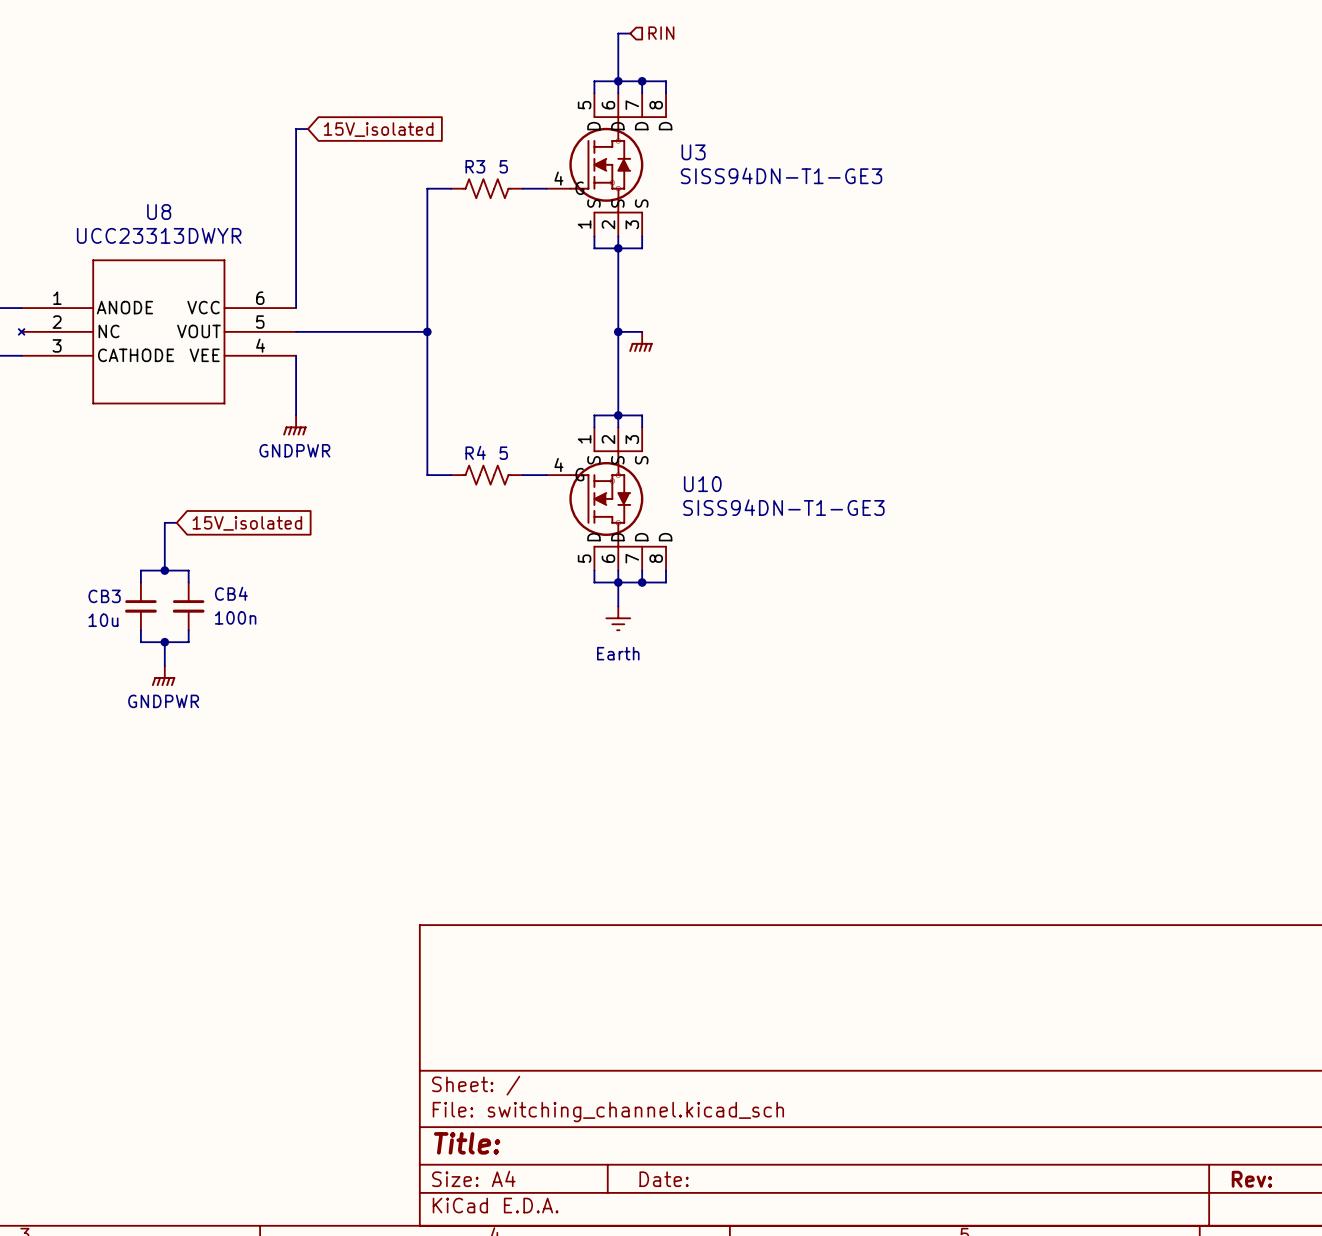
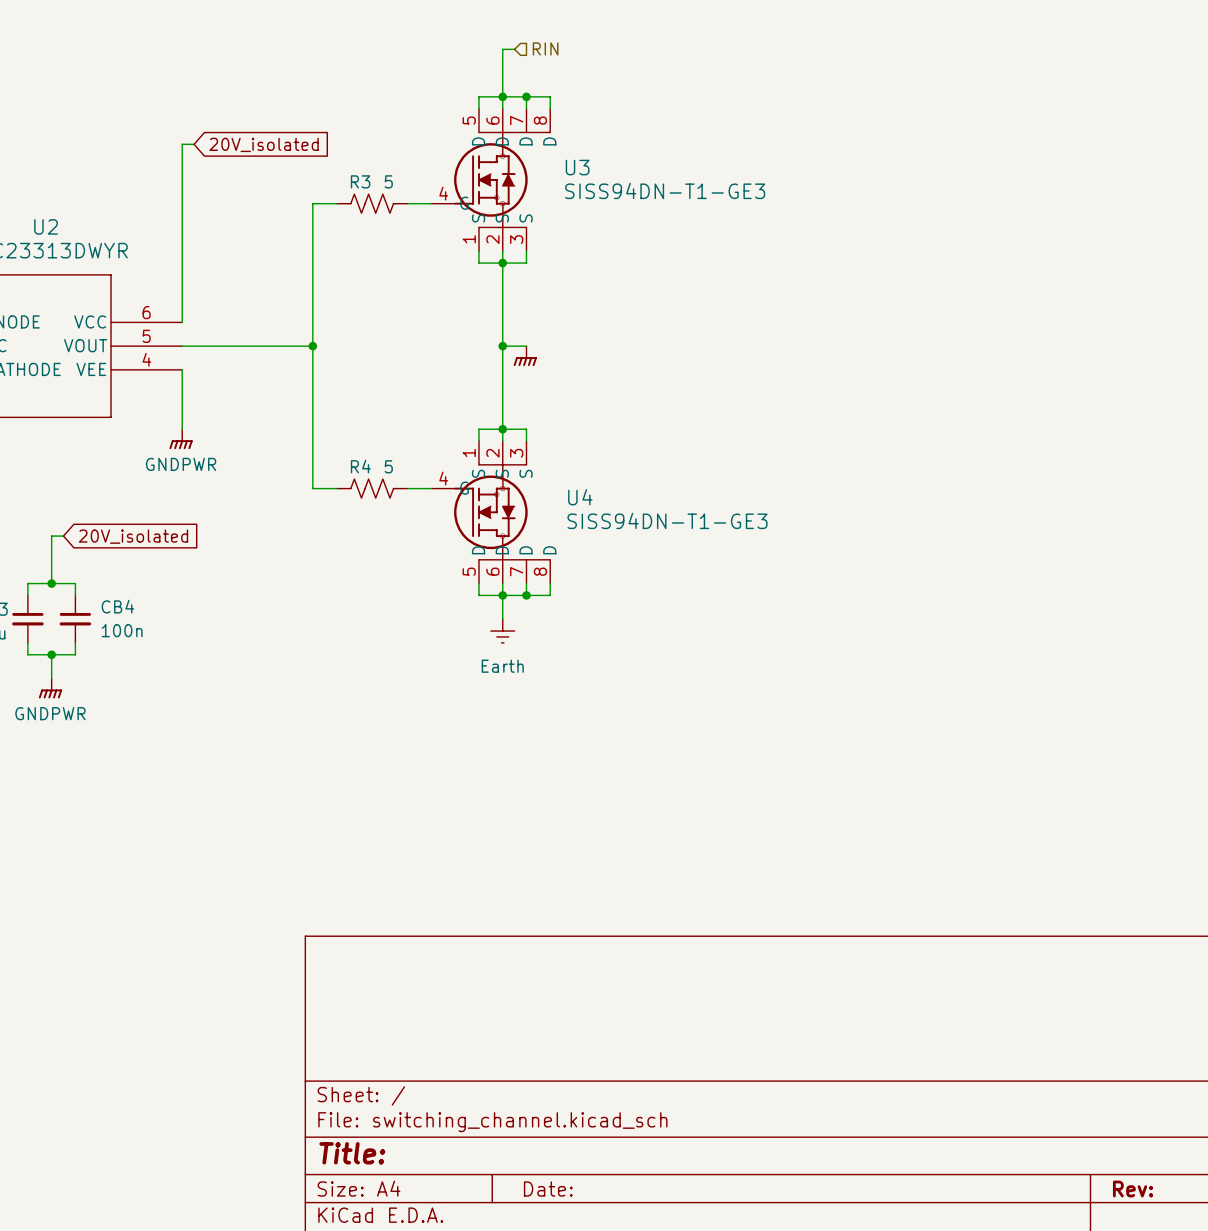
global label: 15V_isolated (378, 129) -> 20V_isolated (264, 144)
U8 name: U8 (159, 212) -> U2 (46, 226)
U10 name: U10 (702, 484) -> U4 (580, 497)
global label: 15V_isolated (247, 523) -> 20V_isolated (133, 536)

